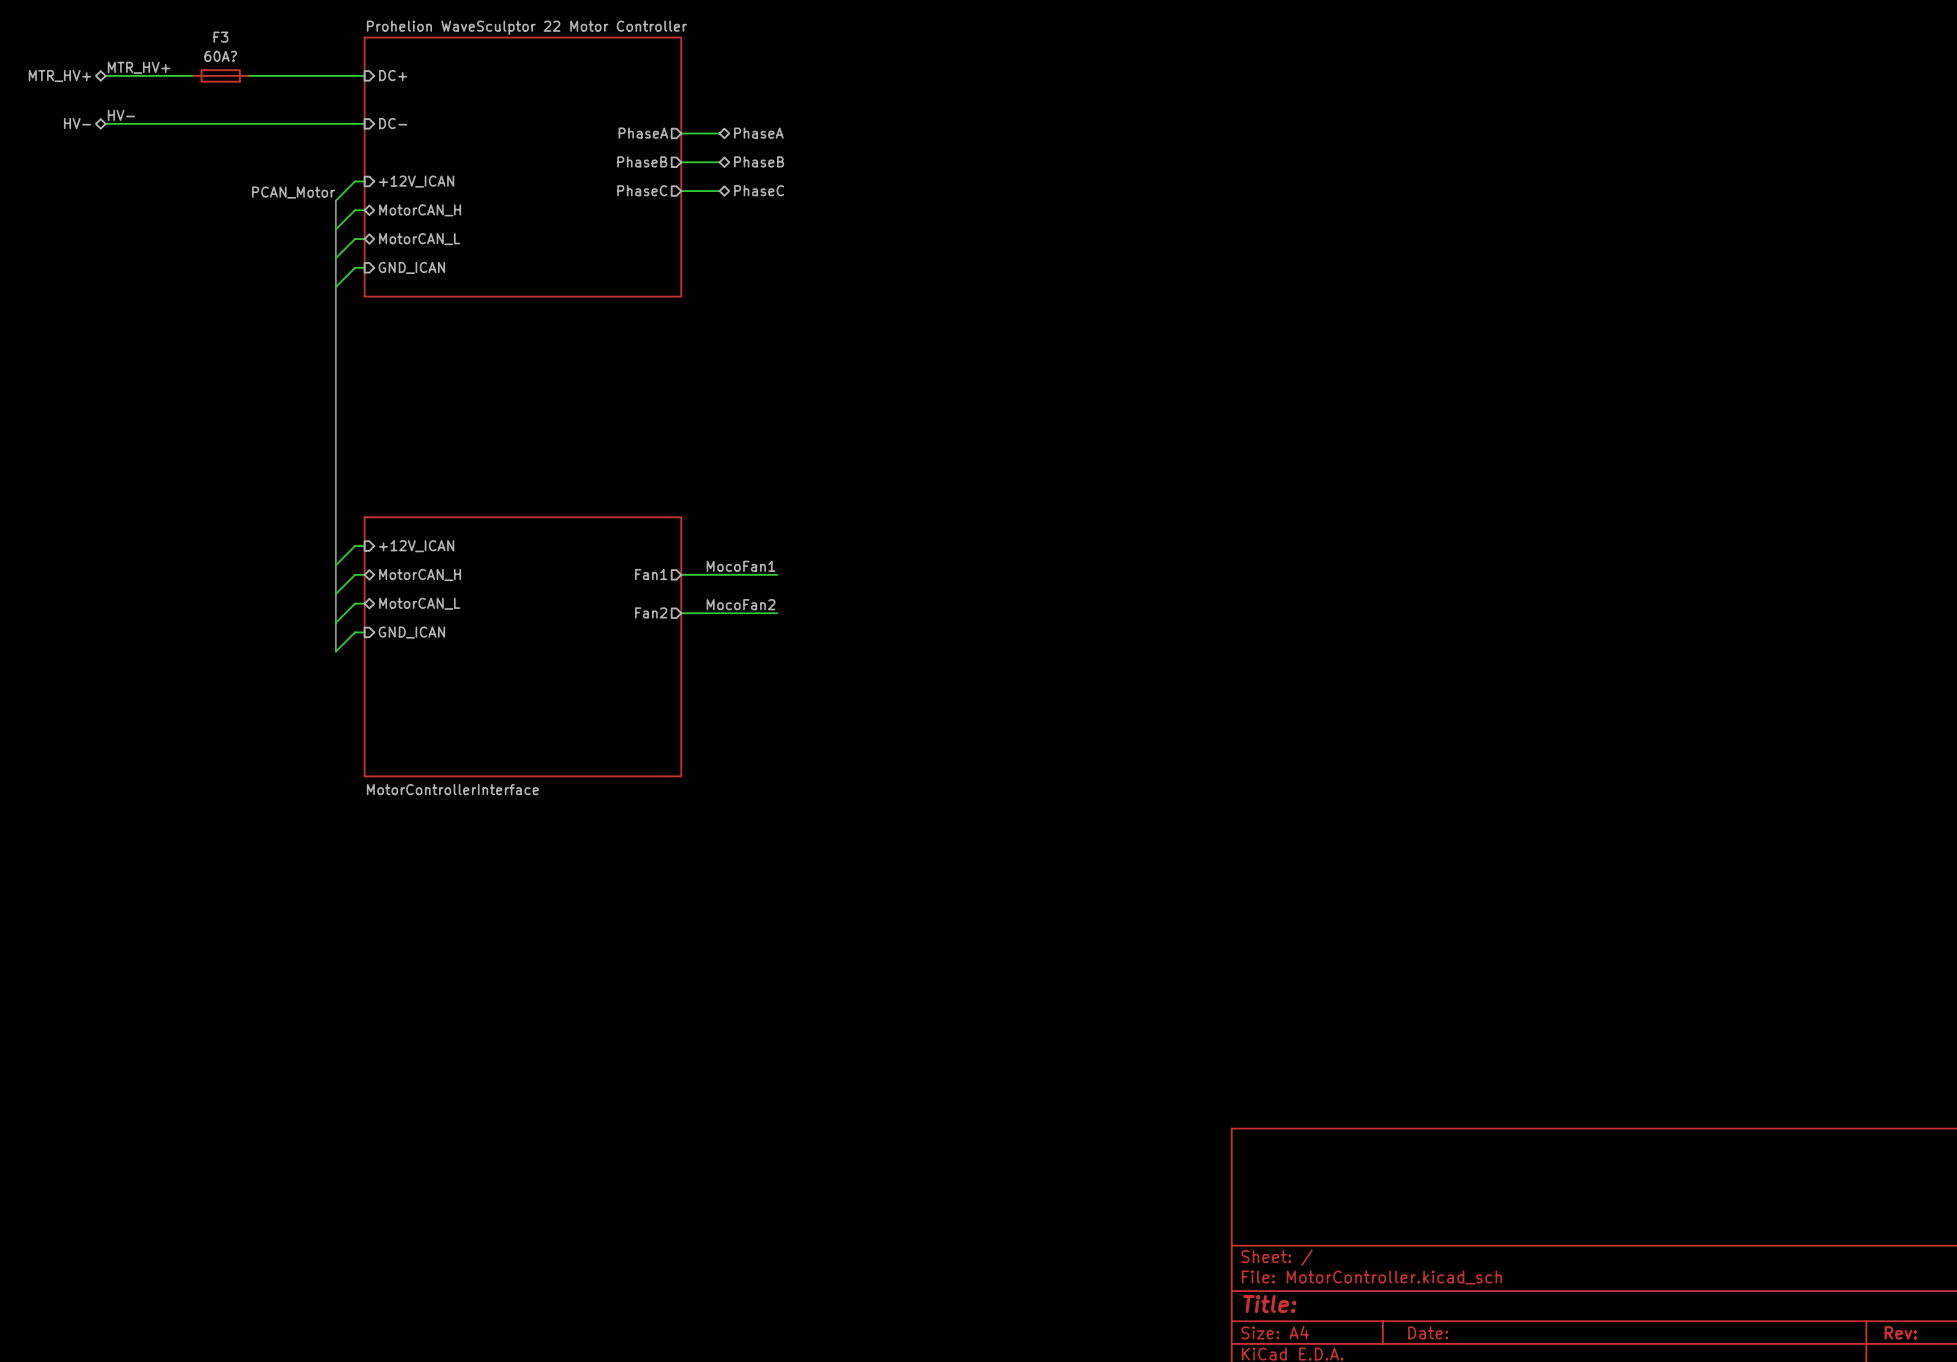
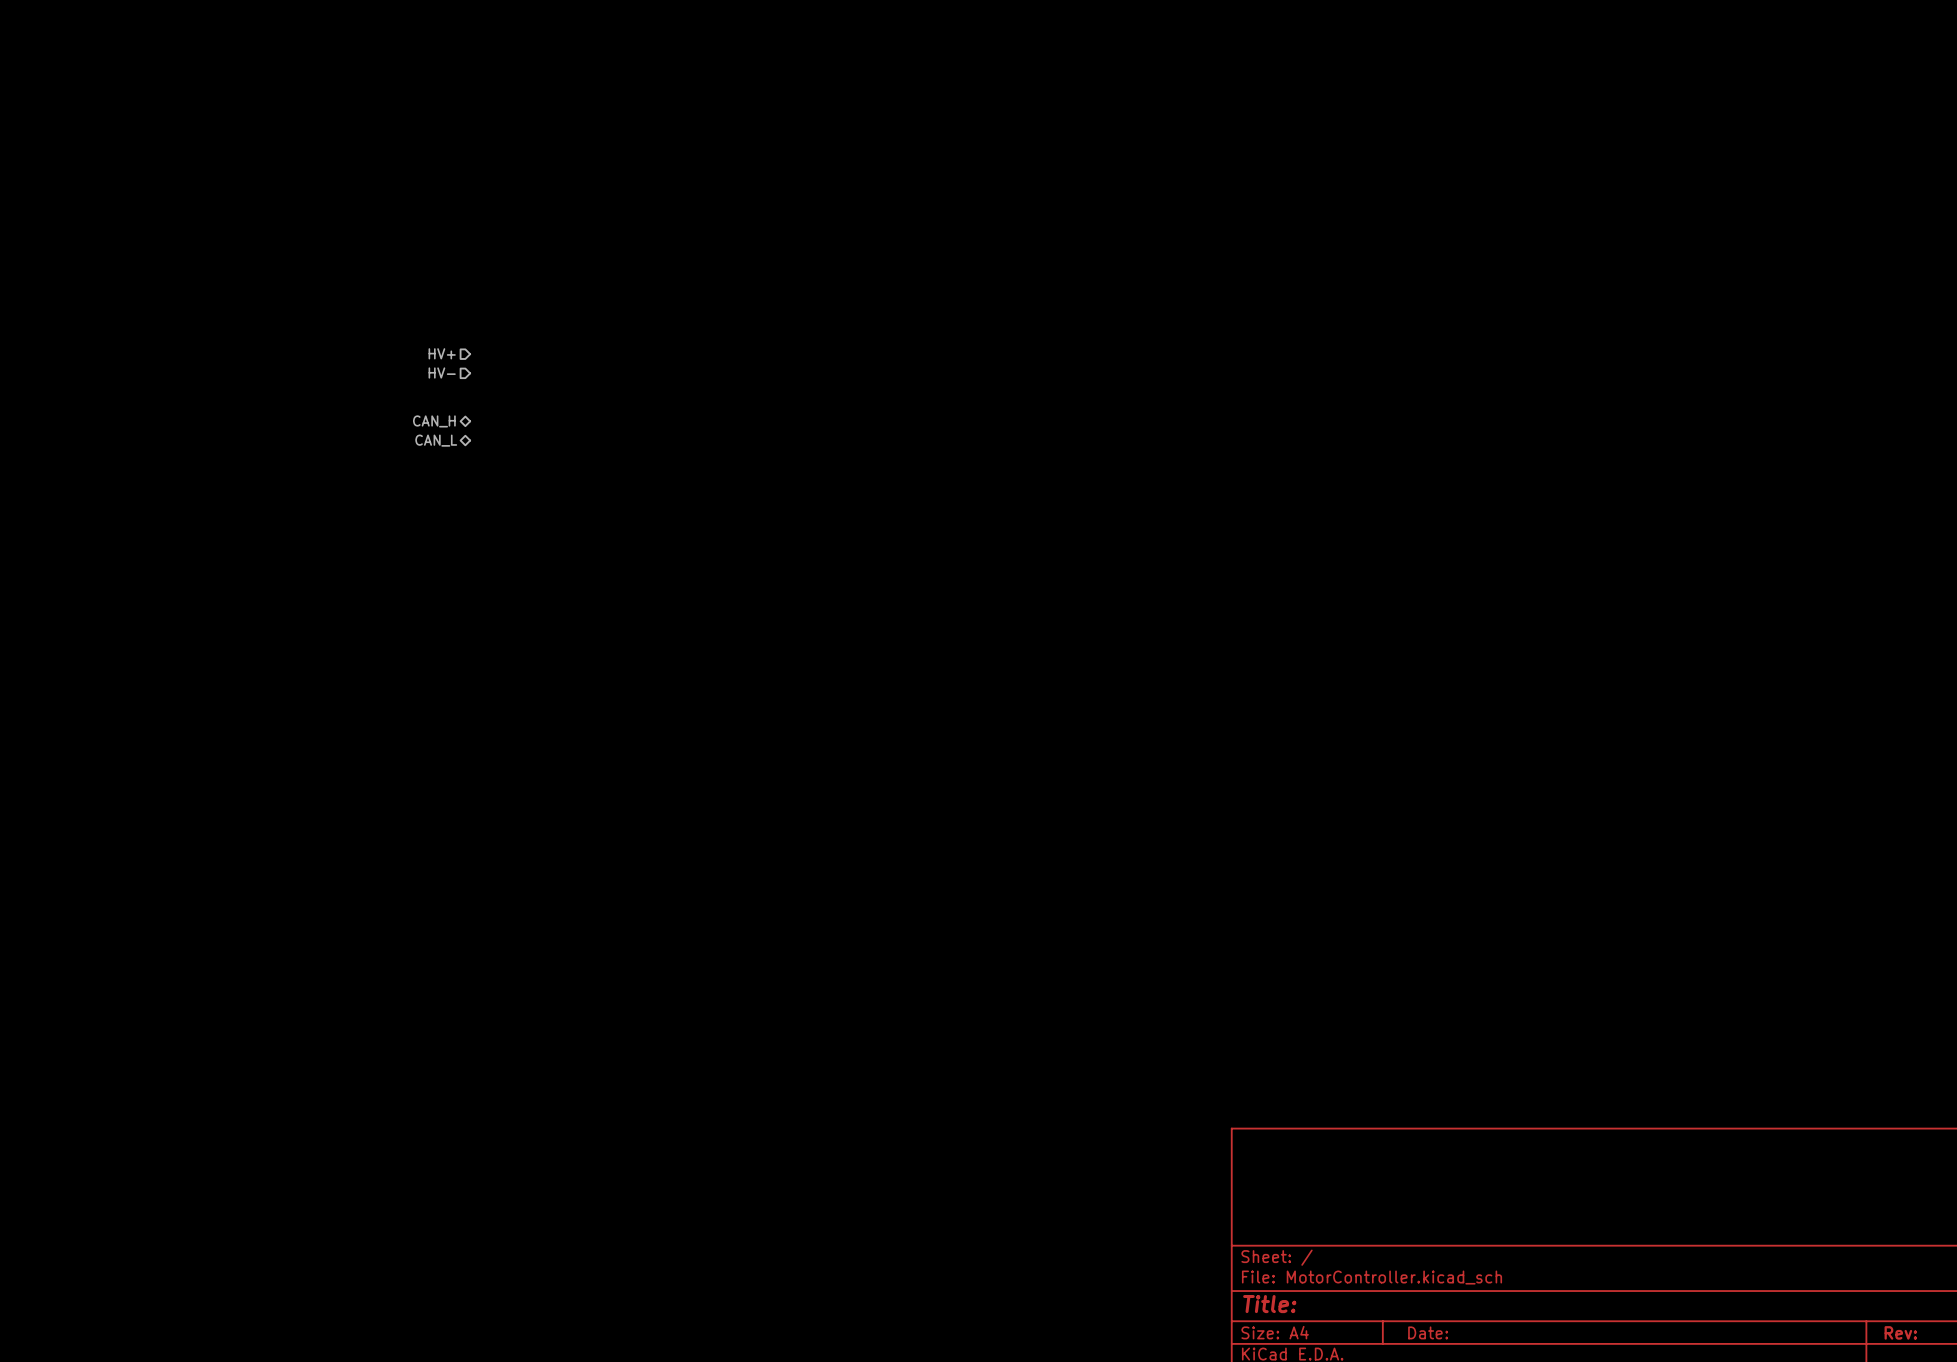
label: MTR_HV+ (138, 67) -> none
wire: (105, 75) (191, 75) -> none
F3: 60A? (220, 75) -> none
wire: (249, 75) (364, 75) -> none
sheet pin: DC+ (393, 75) -> none
hierarchical label: MTR_HV+ (59, 76) -> none
label: HV- (121, 115) -> none
hierarchical label: HV- (77, 123) -> none
wire: (105, 123) (364, 123) -> none
sheet pin: DC- (393, 123) -> none
sheet pin: PhaseA (643, 133) -> none
wire: (681, 133) (719, 133) -> none
hierarchical label: PhaseA (758, 133) -> none
sheet pin: PhaseB (642, 161) -> none
hierarchical label: PhaseB (759, 161) -> none
wire: (681, 162) (719, 162) -> none
sheet Prohelion WaveSculptor 22 Motor Controller: (522, 167) -> none
wire: (364, 181) (355, 181) (335, 200) -> none
sheet pin: +12V_ICAN (416, 181) -> none
sheet pin: PhaseC (642, 190) -> none
hierarchical label: PhaseC (759, 190) -> none
wire: (681, 191) (719, 191) -> none
label: PCAN_Motor (293, 192) -> none
bus: (335, 200) (335, 651) -> none
wire: (364, 210) (355, 210) (335, 229) -> none
sheet pin: MotorCAN_H (420, 210) -> none
wire: (364, 239) (355, 239) (335, 258) -> none
sheet pin: MotorCAN_L (419, 239) -> none
wire: (364, 267) (355, 267) (335, 287) -> none
sheet pin: GND_ICAN (411, 267) -> none
hierarchical label: none -> HV+ (442, 353)
hierarchical label: none -> HV- (442, 373)
hierarchical label: none -> CAN_H (434, 421)
hierarchical label: none -> CAN_L (436, 440)
wire: (364, 546) (355, 546) (335, 565) -> none
sheet pin: +12V_ICAN (416, 546) -> none
label: MocoFan1 (741, 566) -> none
wire: (364, 574) (355, 574) (335, 594) -> none
sheet pin: MotorCAN_H (420, 574) -> none
sheet pin: Fan1 (651, 574) -> none
wire: (681, 574) (777, 574) -> none
wire: (364, 603) (355, 603) (335, 622) -> none
sheet pin: MotorCAN_L (419, 603) -> none
label: MocoFan2 (741, 604) -> none
sheet pin: Fan2 (651, 612) -> none
wire: (681, 613) (777, 613) -> none
wire: (364, 632) (355, 632) (335, 651) -> none
sheet pin: GND_ICAN (411, 632) -> none
sheet MotorControllerInterface: (522, 646) -> none

